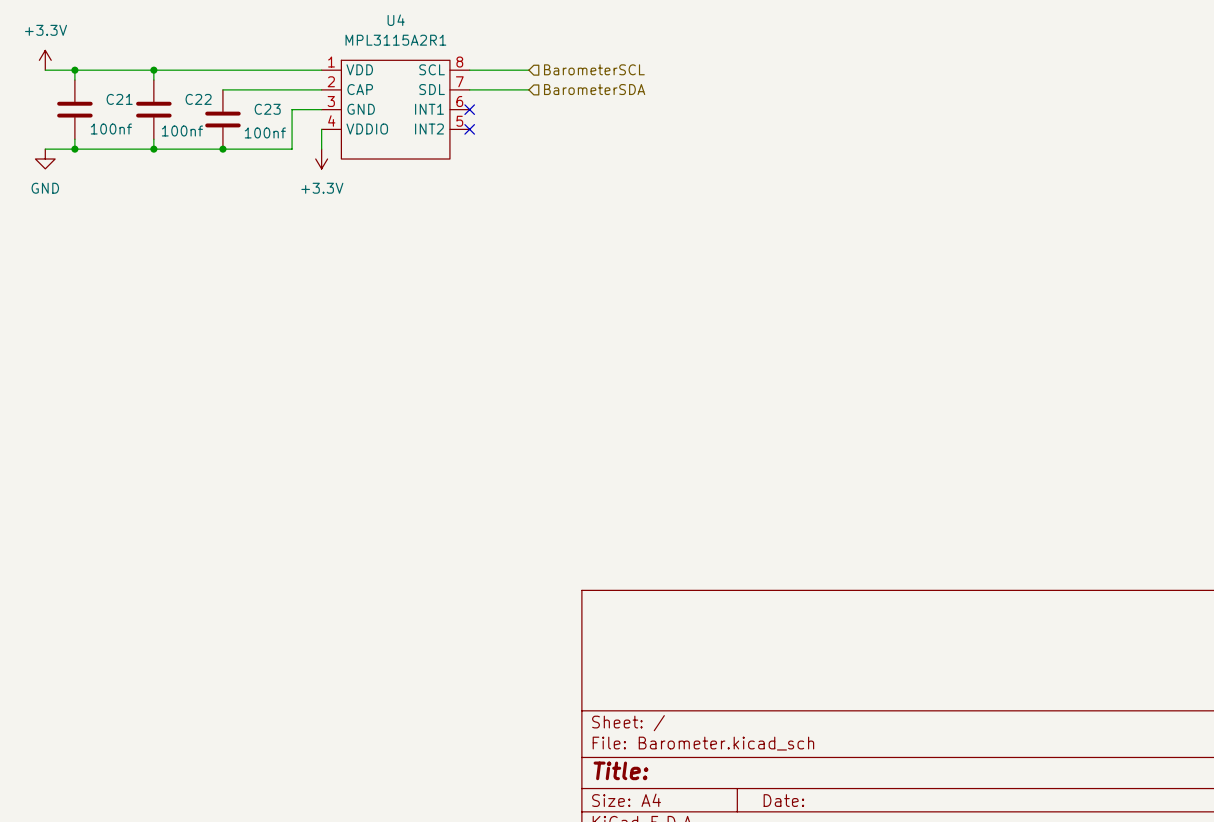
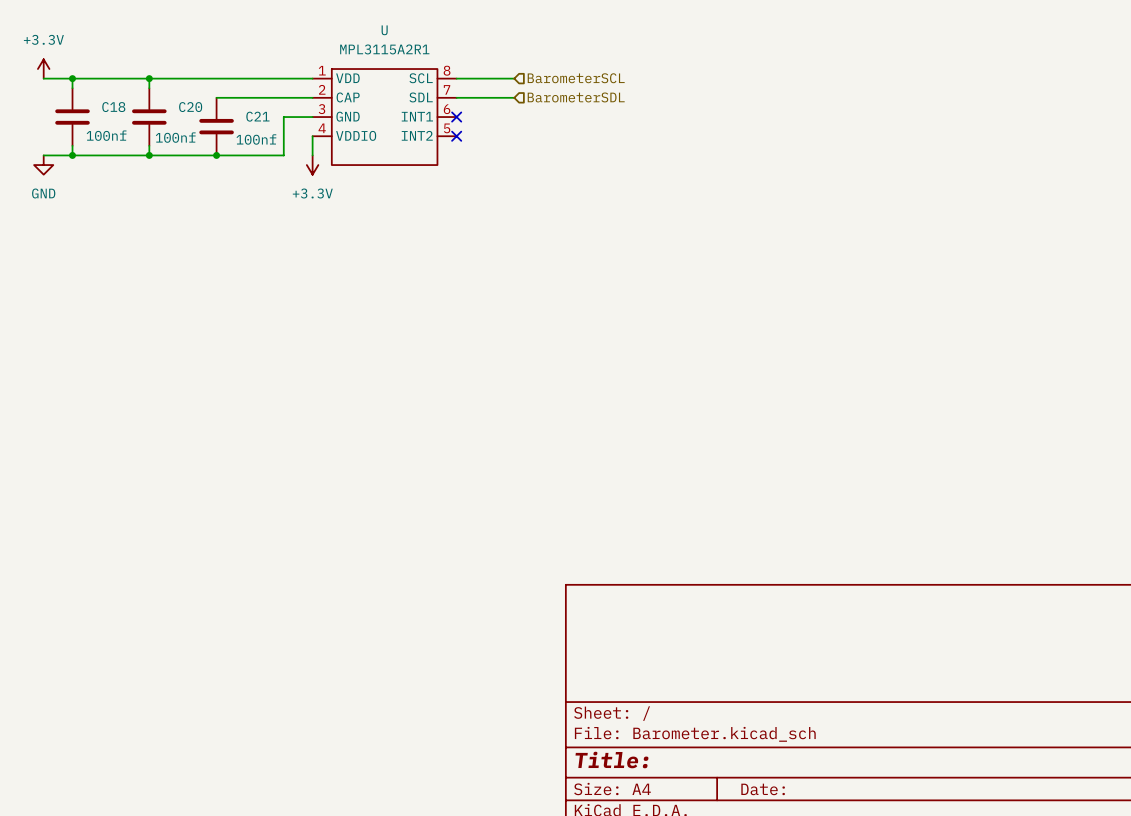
U4 name: U4 (396, 20) -> U (384, 30)
hierarchical label: BarometerSDA (594, 89) -> BarometerSDL (576, 97)
C21 name: C21 (119, 99) -> C18 (113, 107)
C22 name: C22 (198, 99) -> C20 (190, 107)
C23 name: C23 (267, 109) -> C21 (257, 116)

